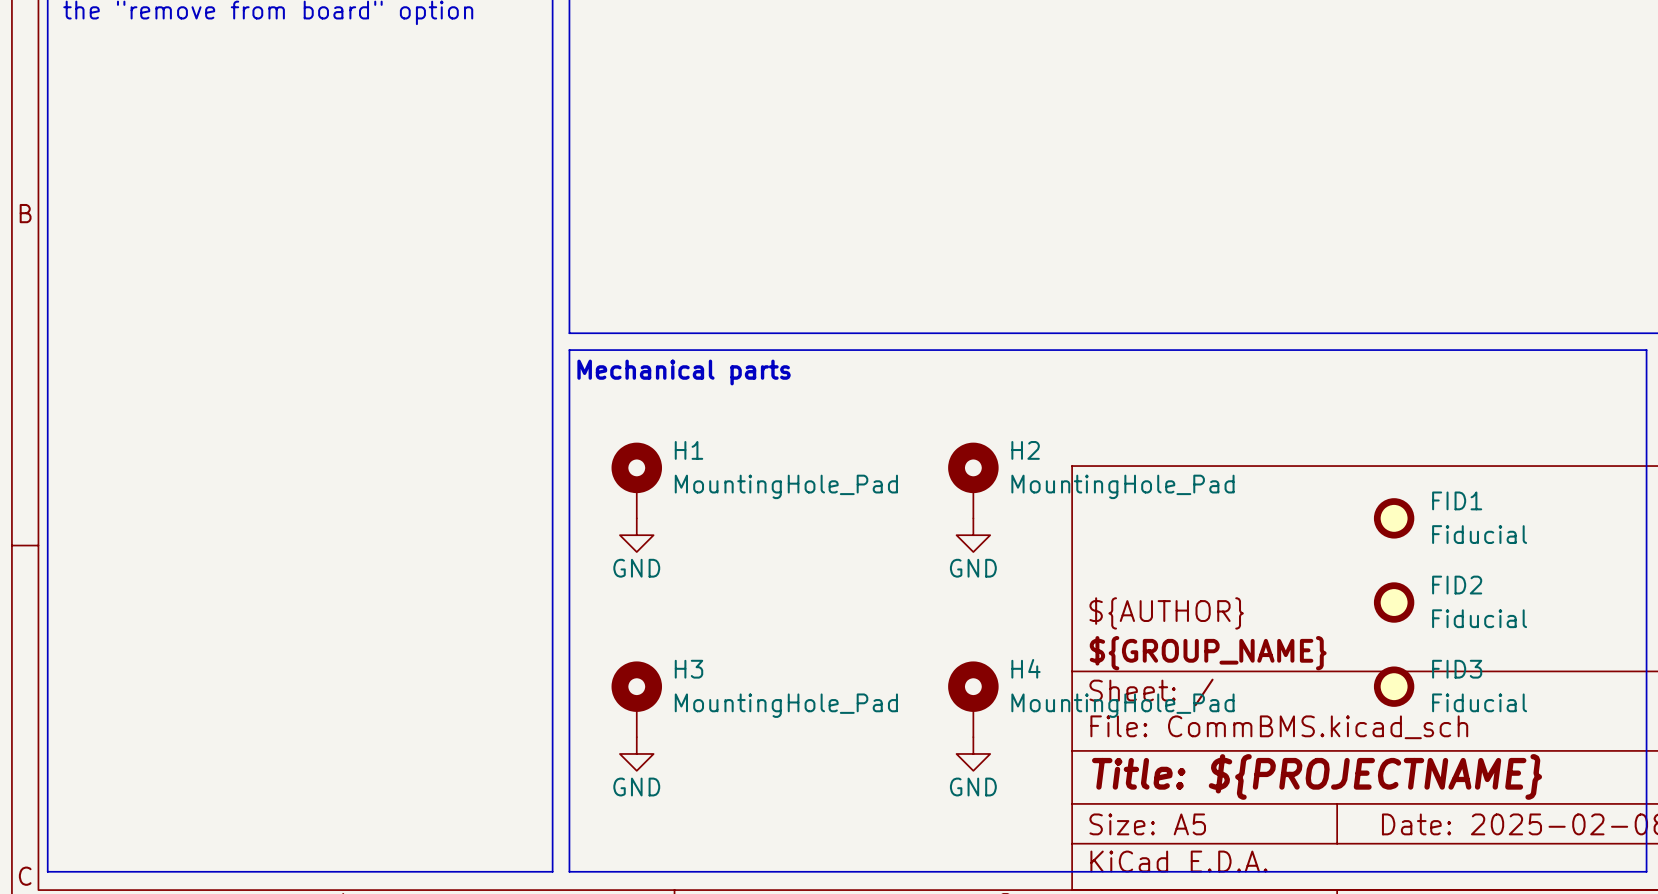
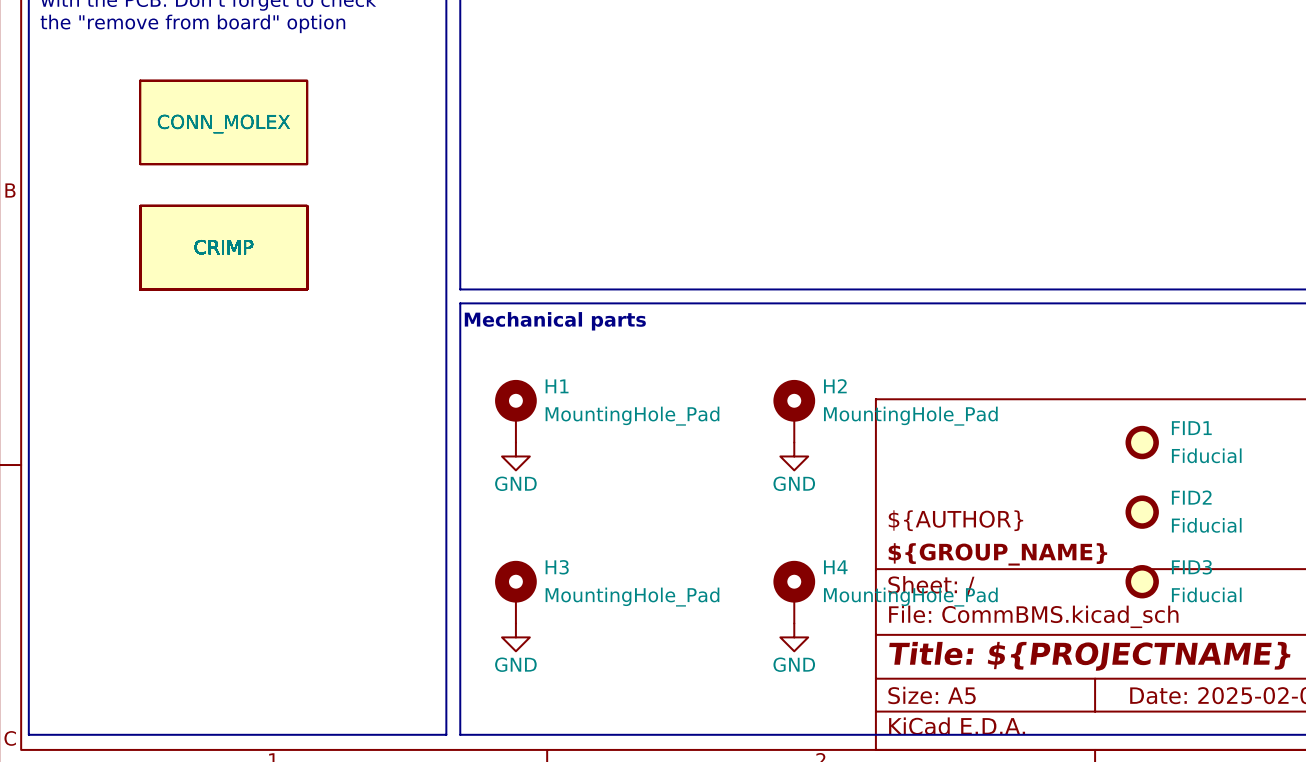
part: none -> CONN_MOLEX (223, 122)
part: none -> CRIMP (223, 247)

